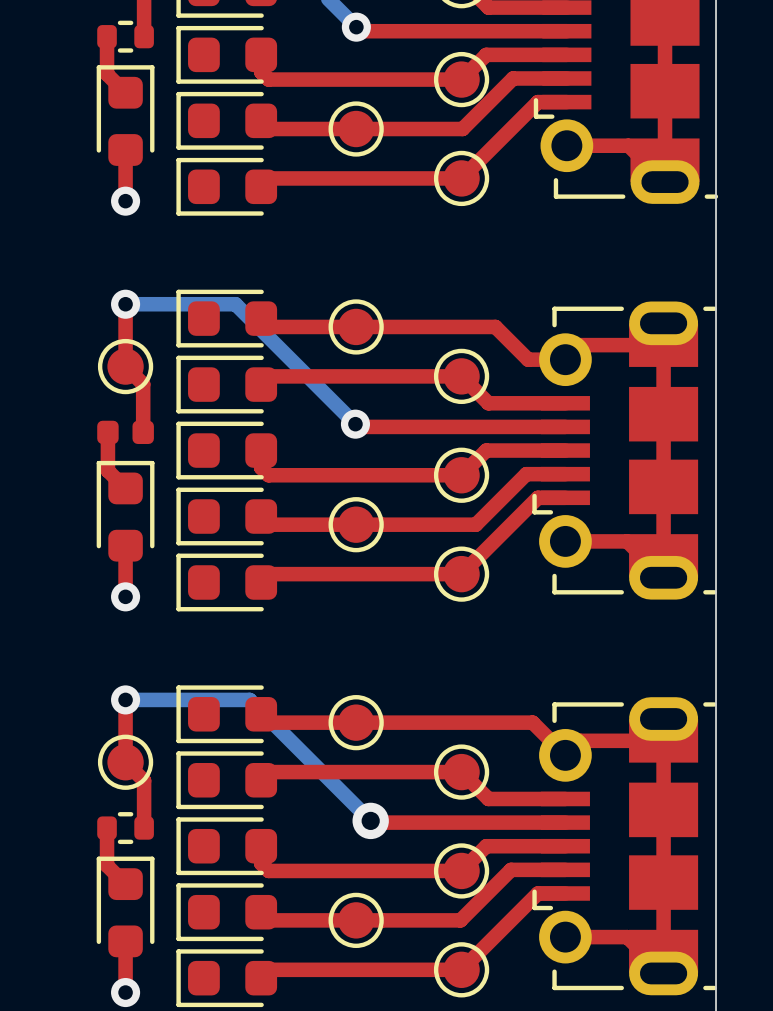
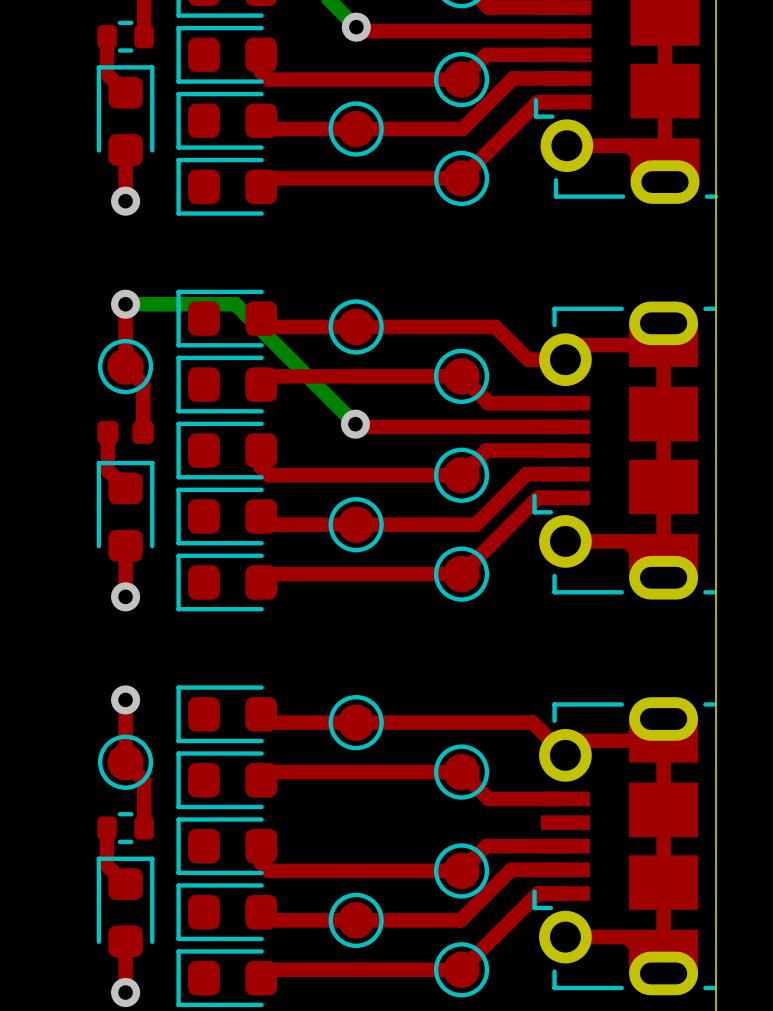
bottom track: (125, 699) (249, 699) (370, 820) -> none
top track: (370, 820) (372, 822) (565, 822) -> none
via: (370, 820) -> none

